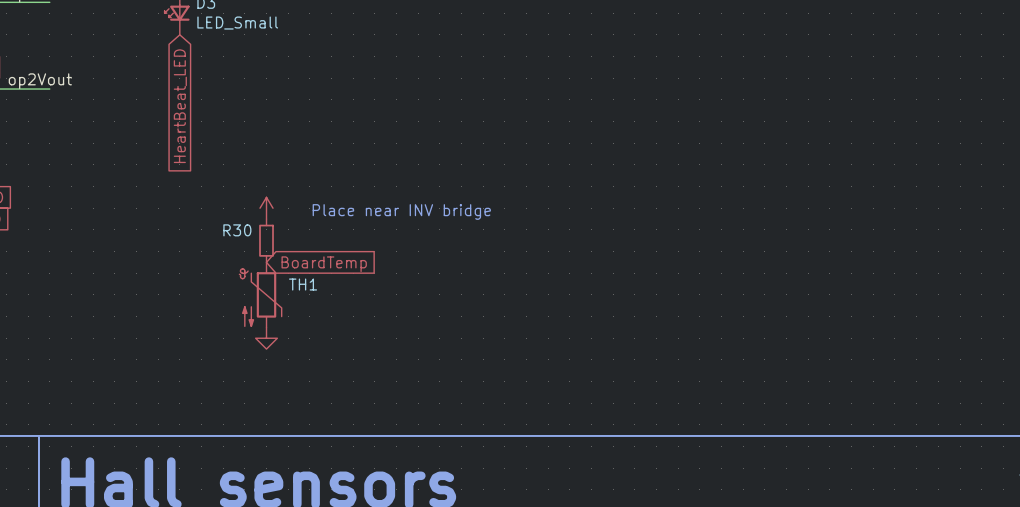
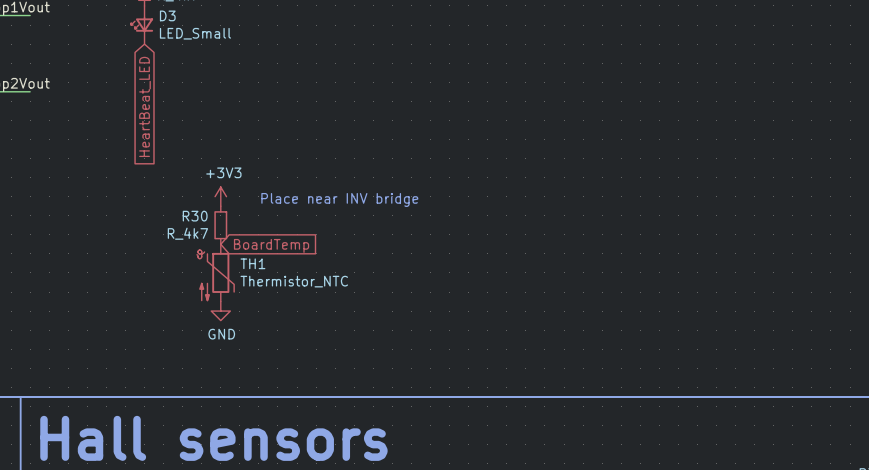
power symbol text: none -> +3V3 (223, 172)
R30 value: none -> R_4k7 (187, 233)
TH1 value: none -> Thermistor_NTC (294, 281)
power symbol text: none -> GND (221, 334)

